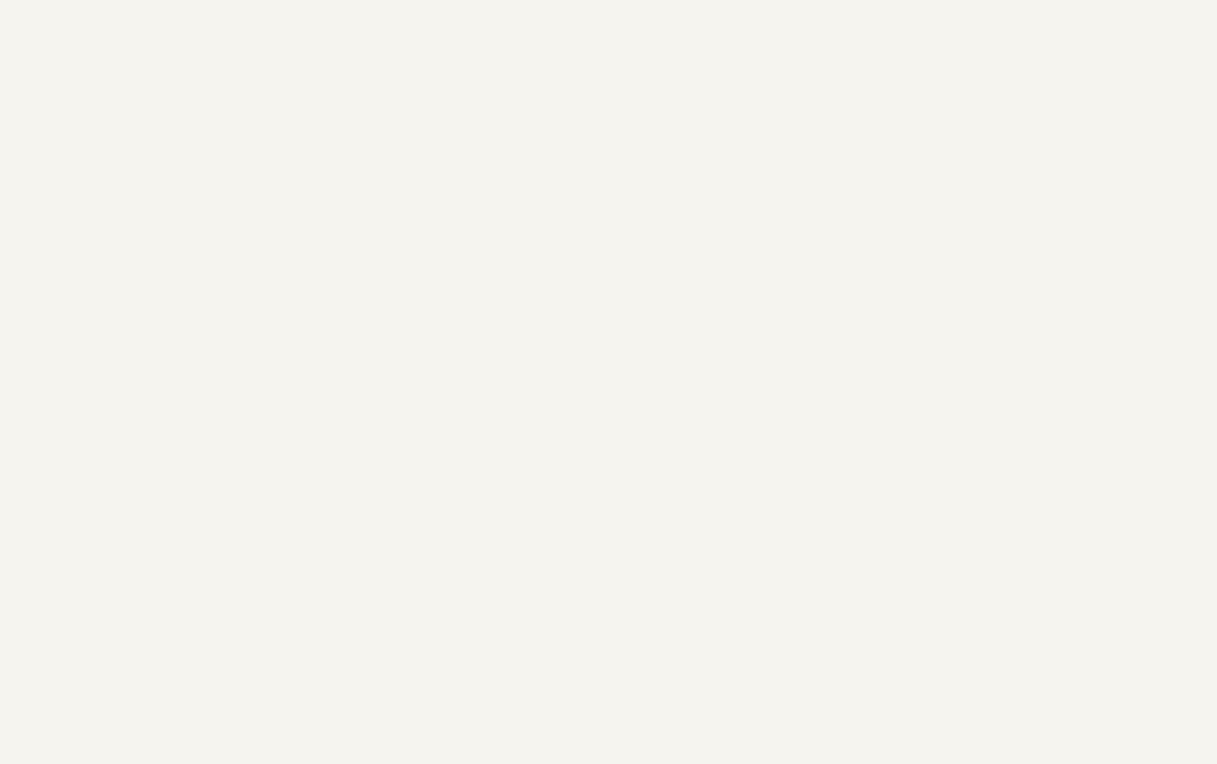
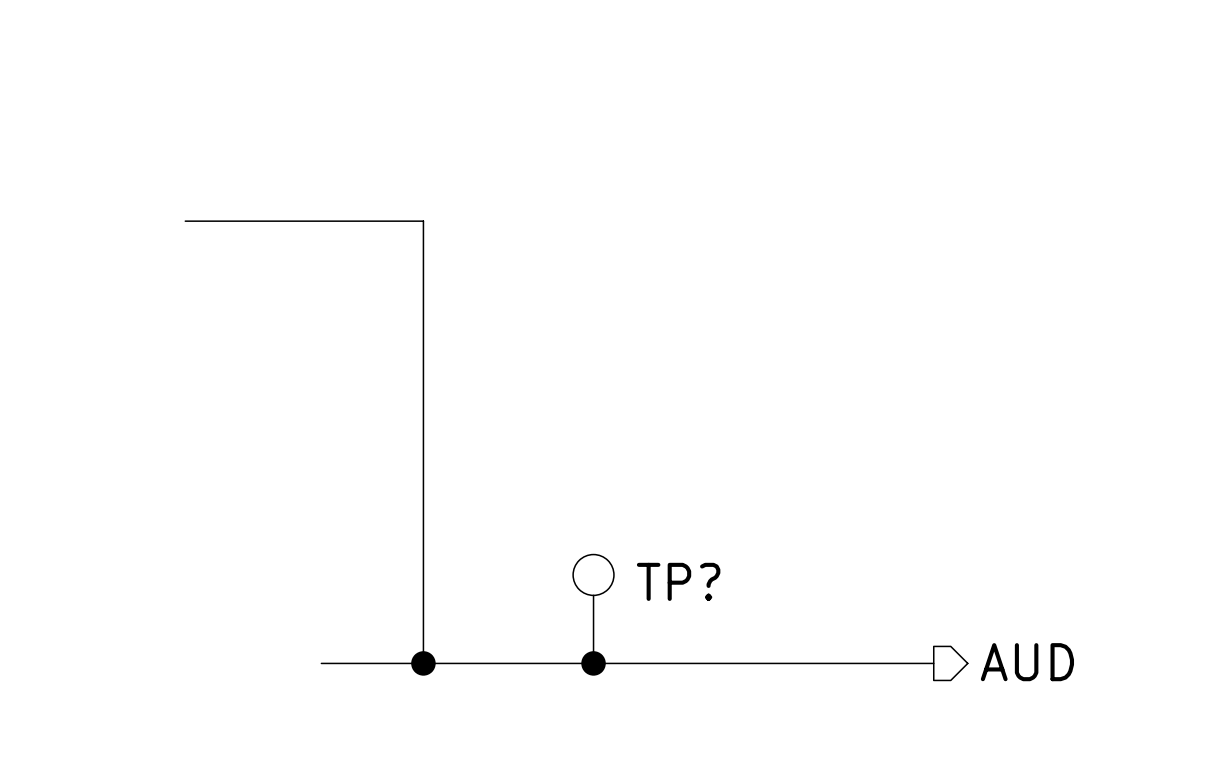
wire: none -> (185, 221) (423, 221) (423, 663)
TP?: none -> (593, 609)
hierarchical label: none -> AUD (1027, 662)
wire: none -> (321, 663) (933, 663)
junction: none -> (423, 663)
junction: none -> (593, 663)

